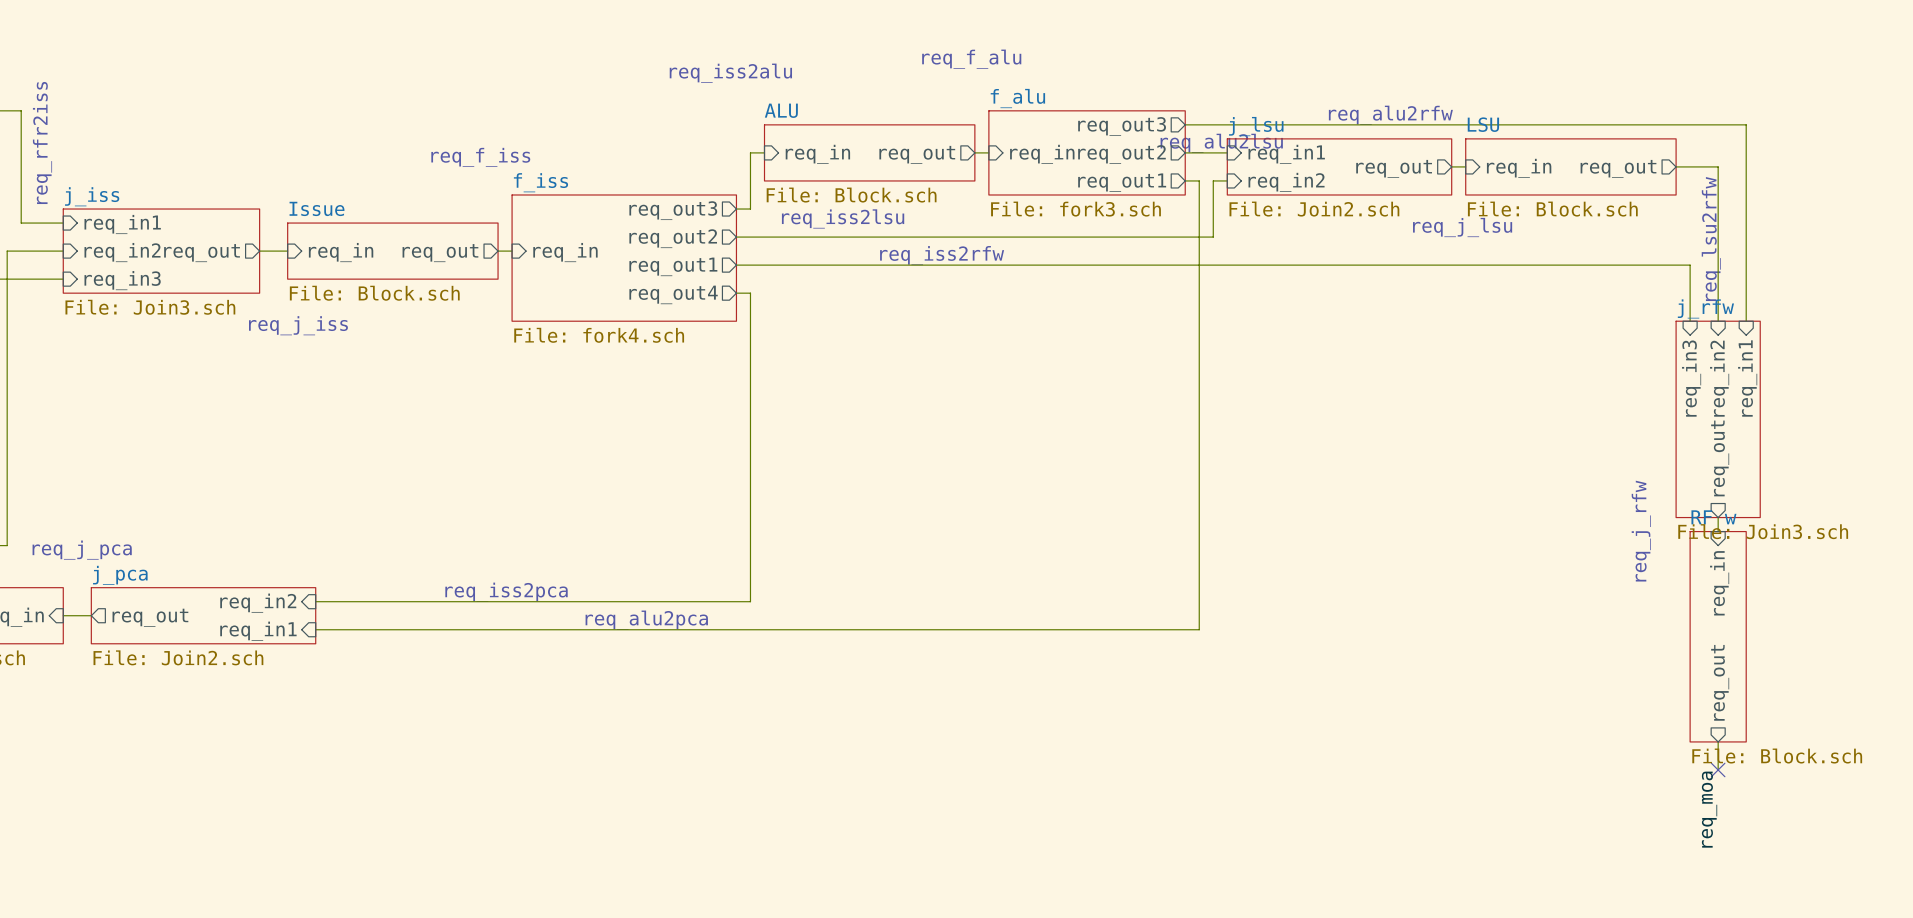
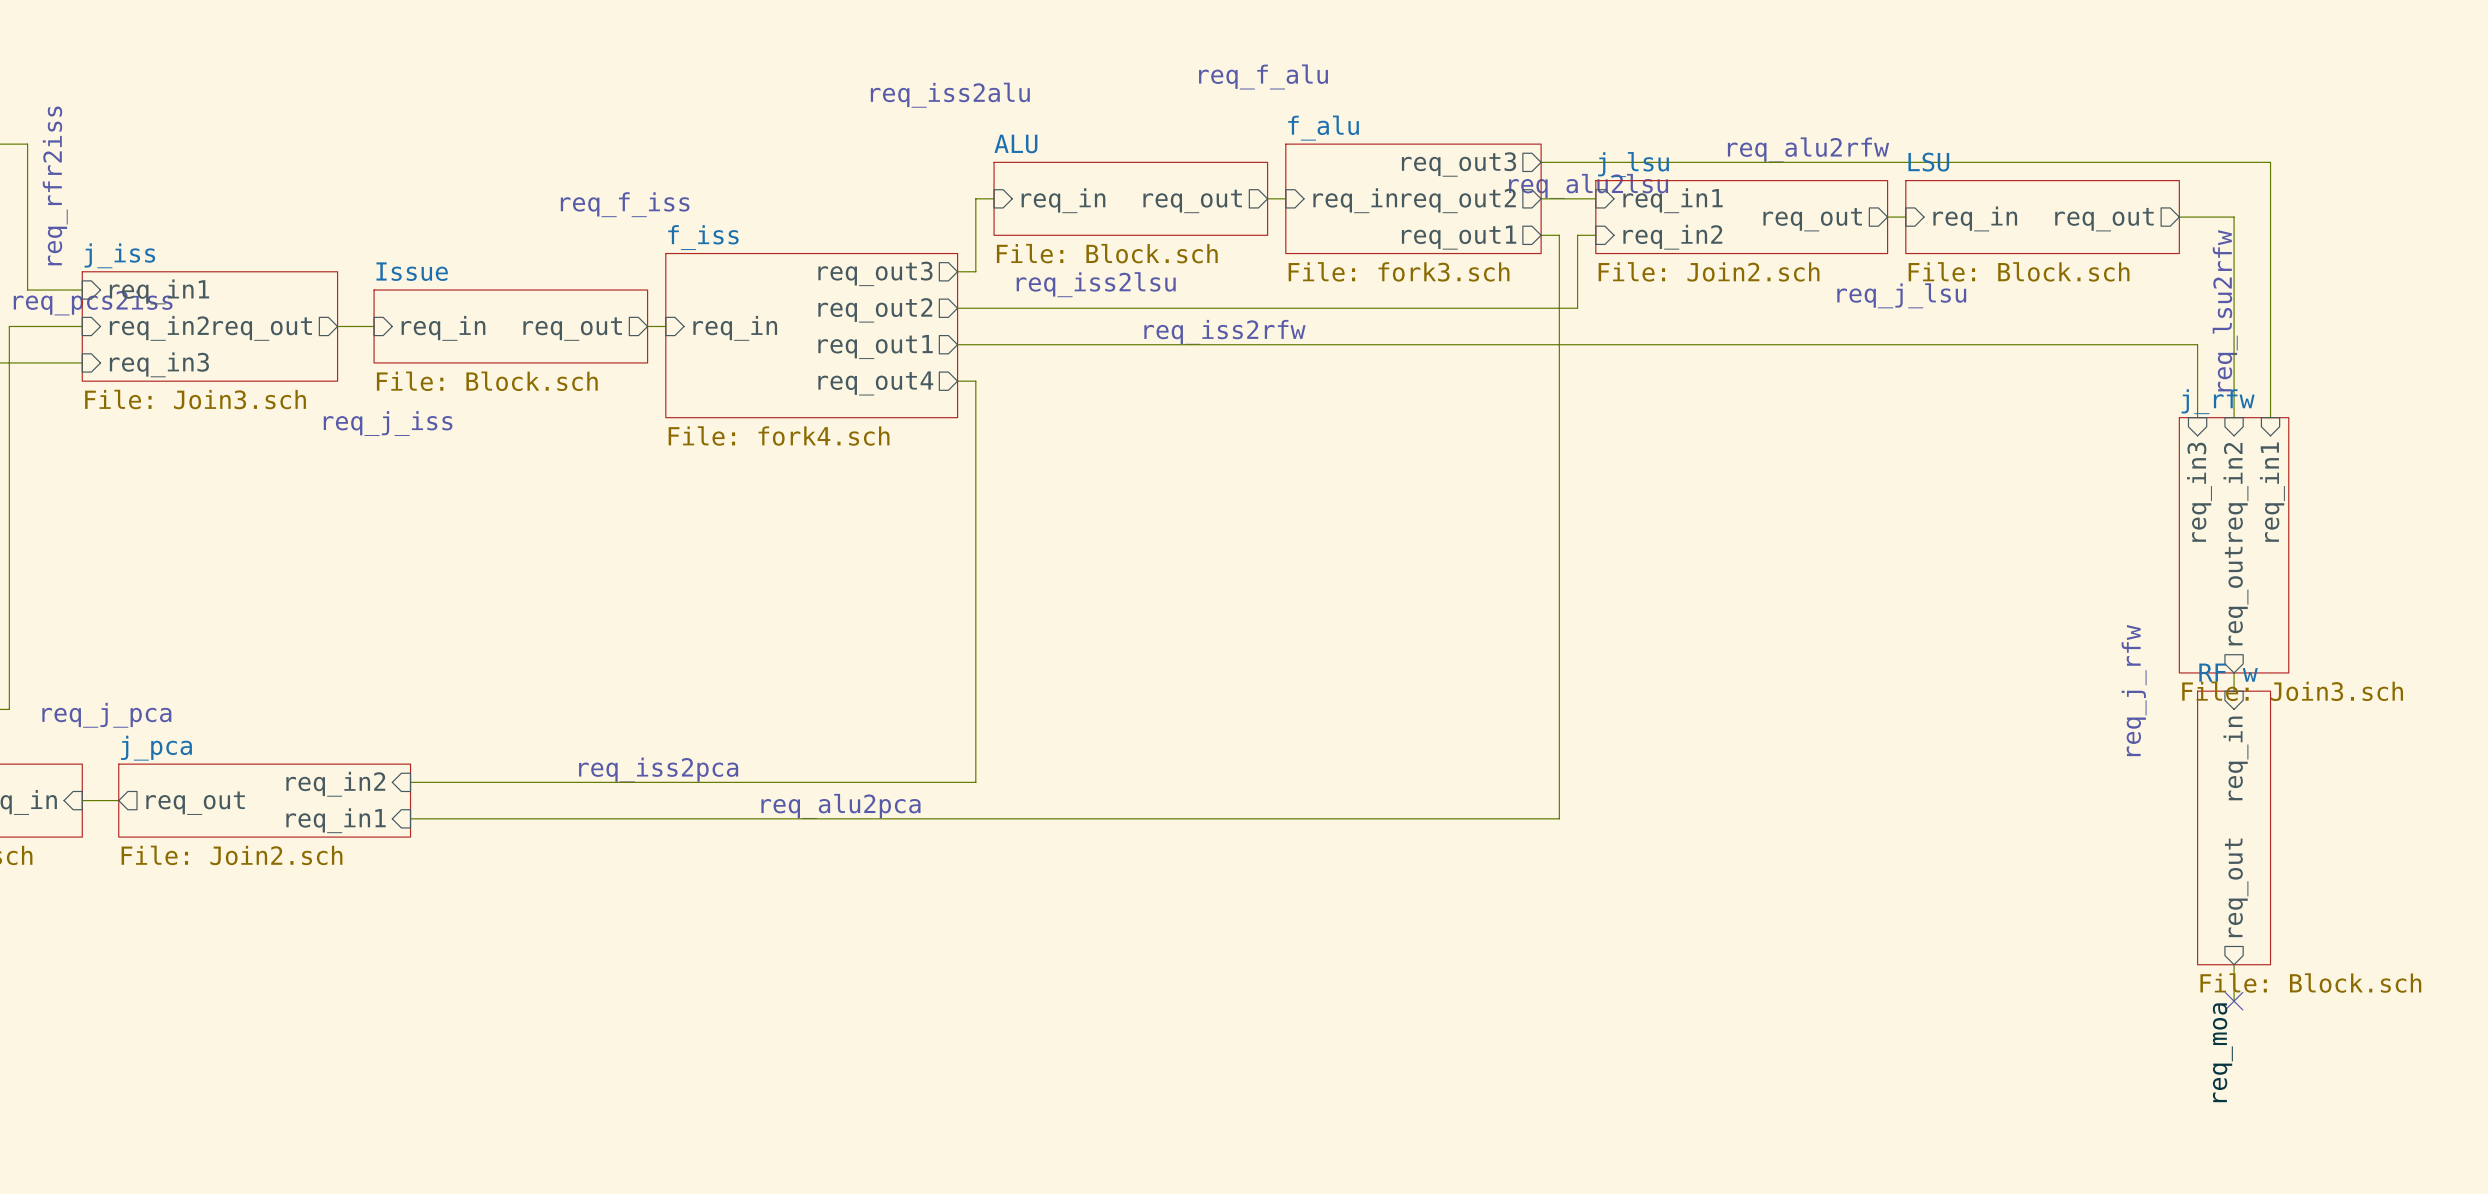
text: none -> req_pcs2iss (93, 302)

